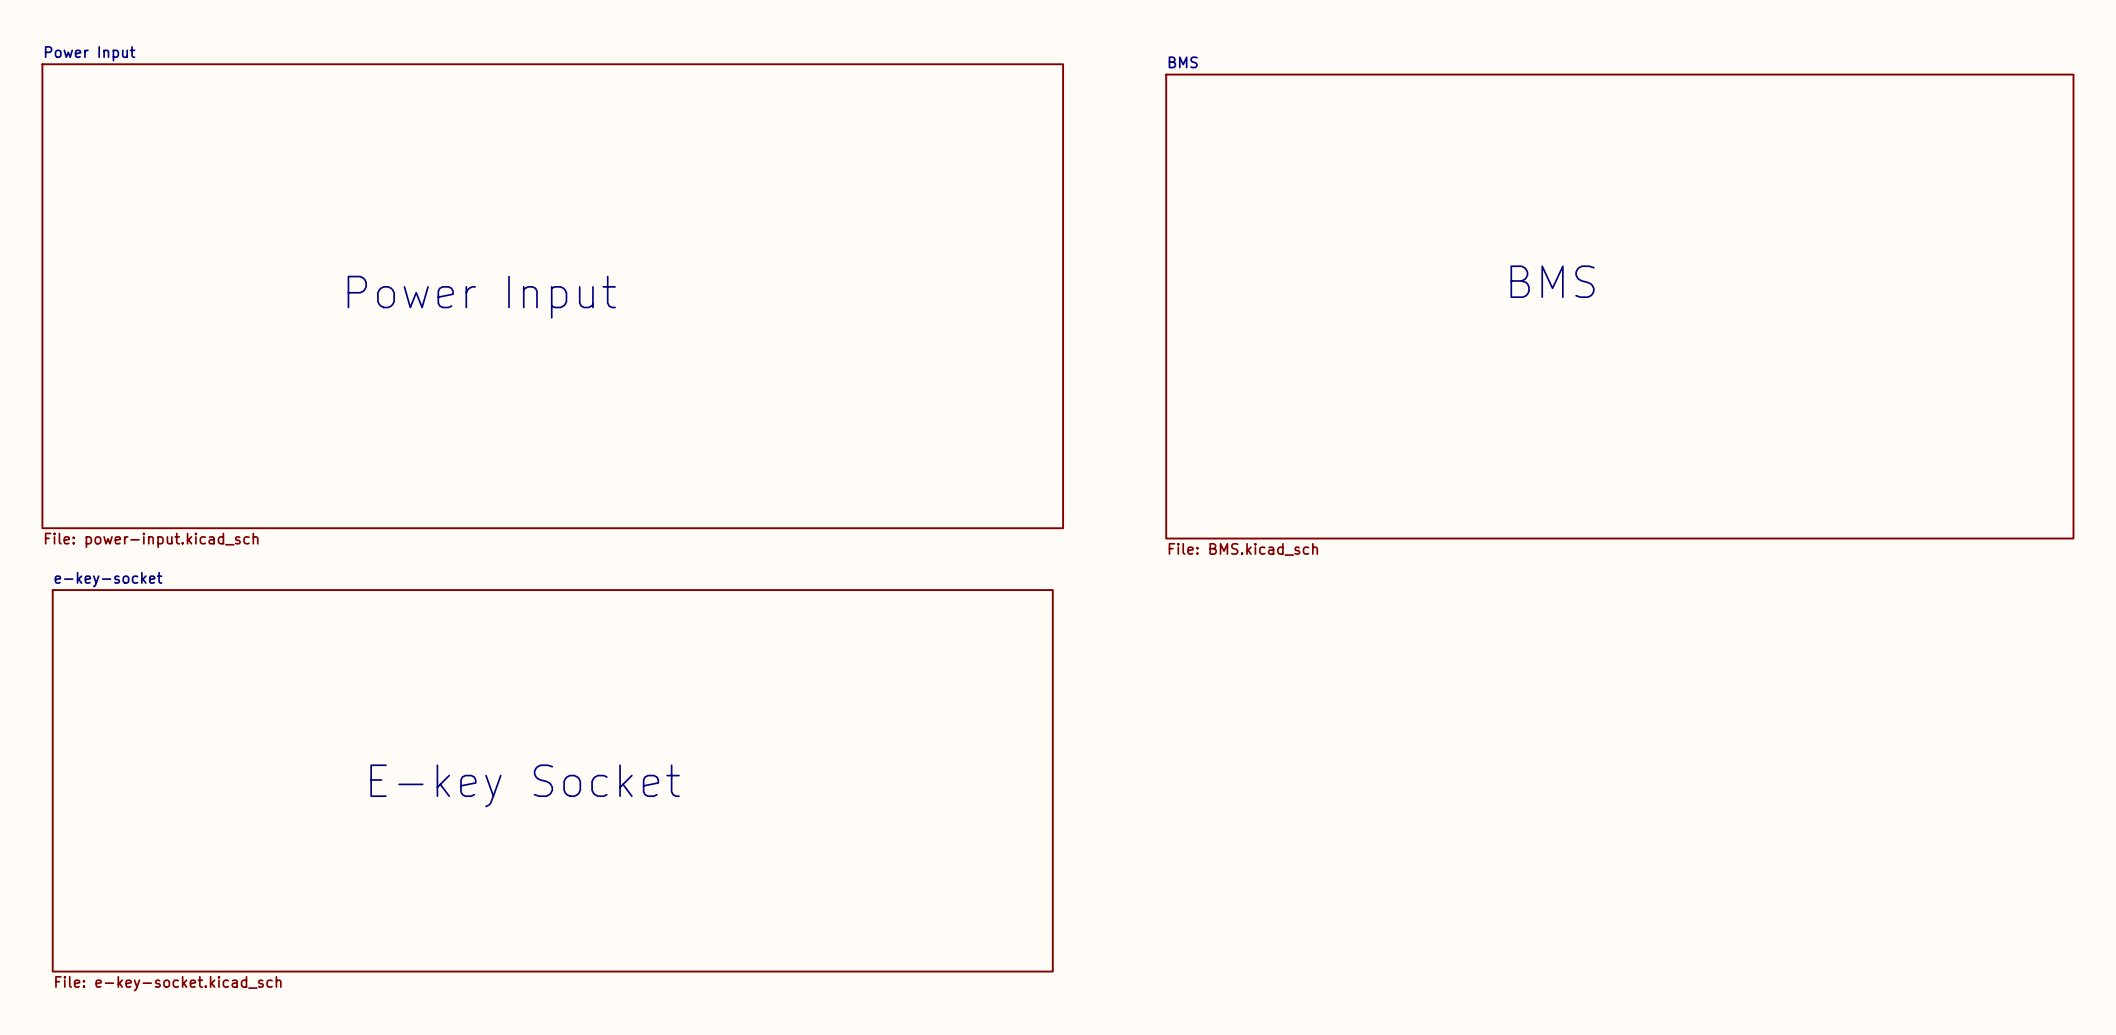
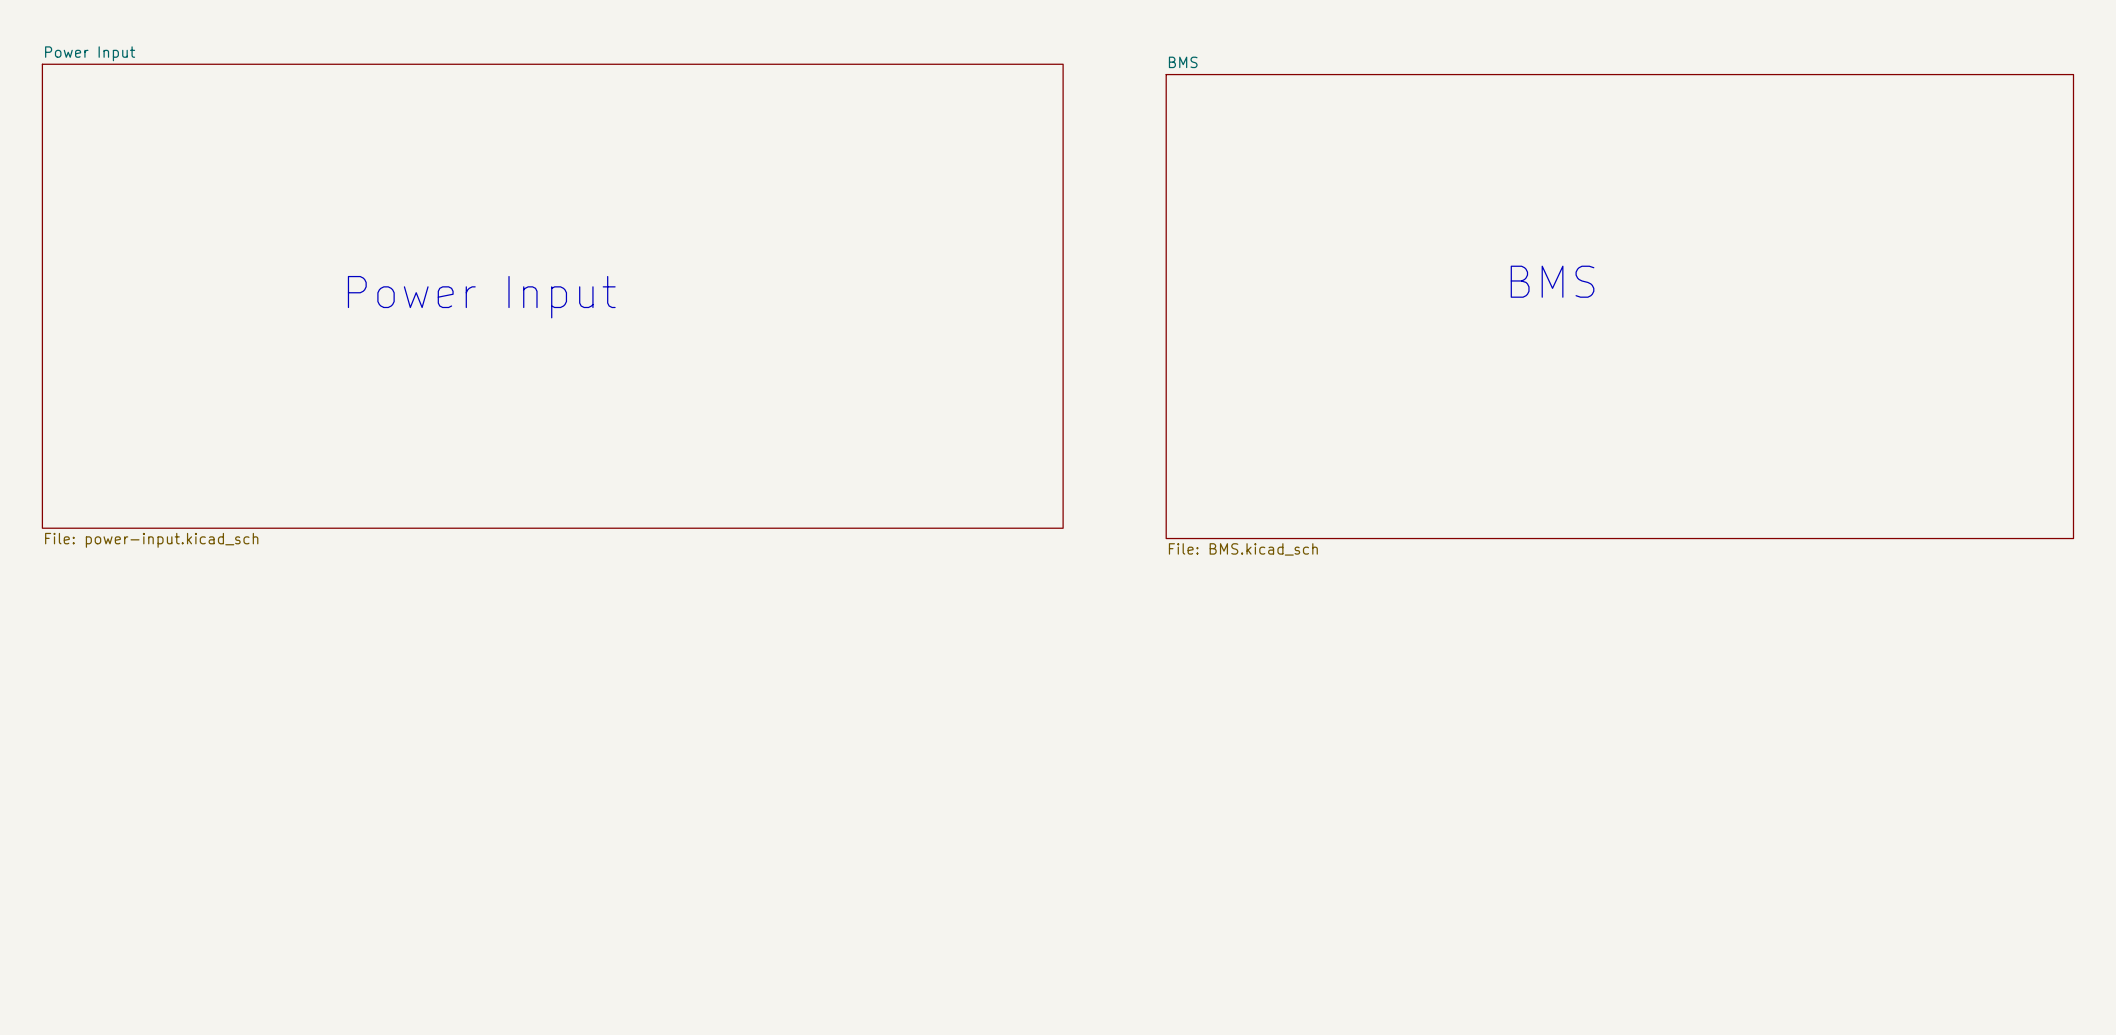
sheet e-key-socket: File: e-key-socket.kicad_sch (552, 780) -> none
text: E-key Socket (525, 785) -> none

